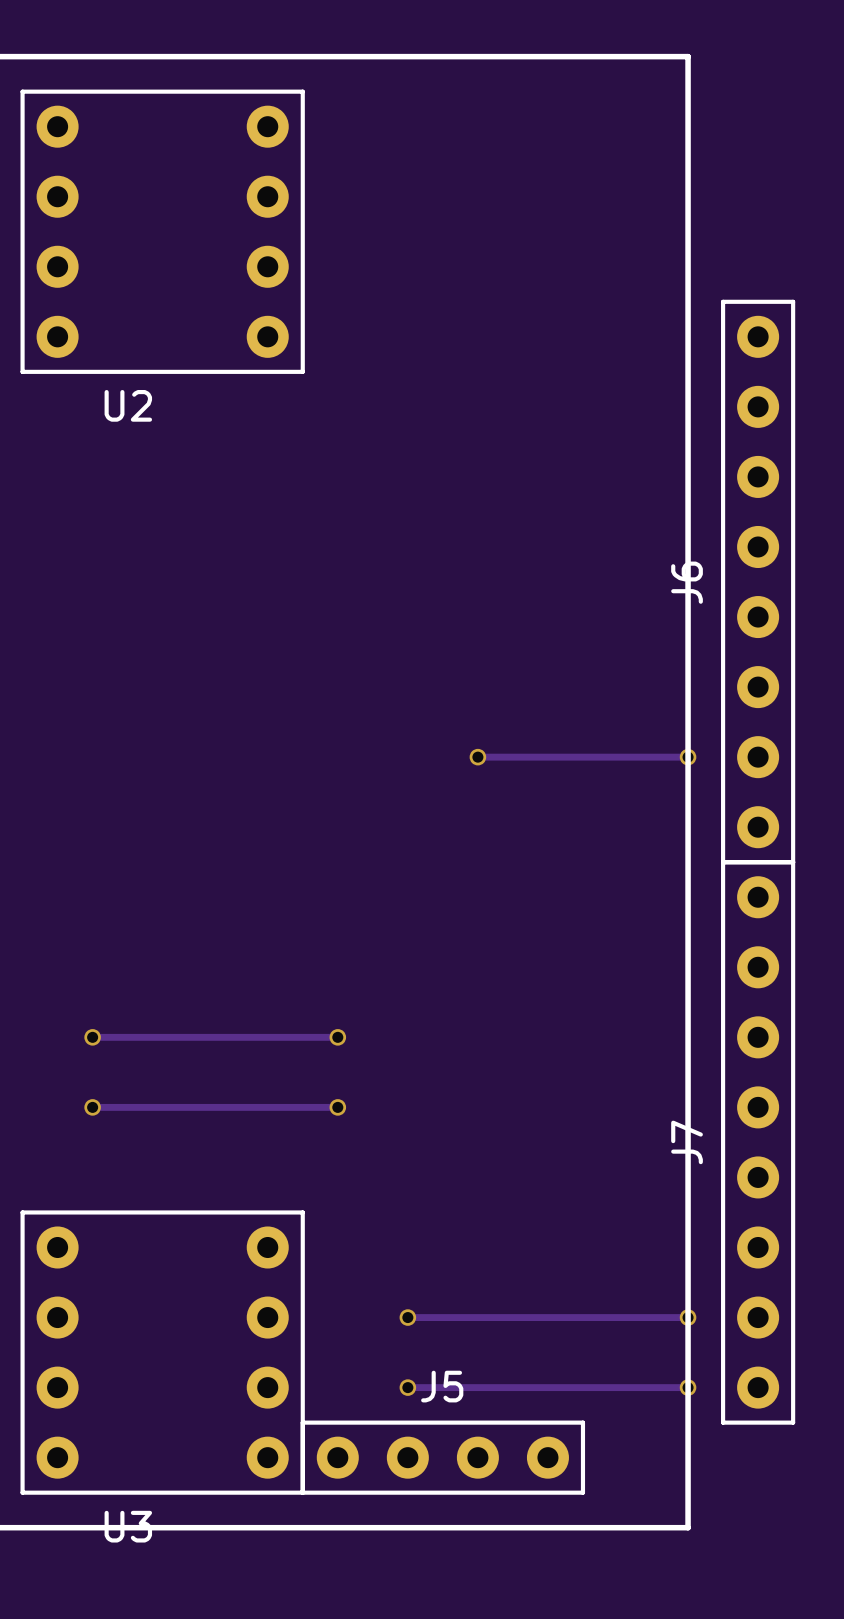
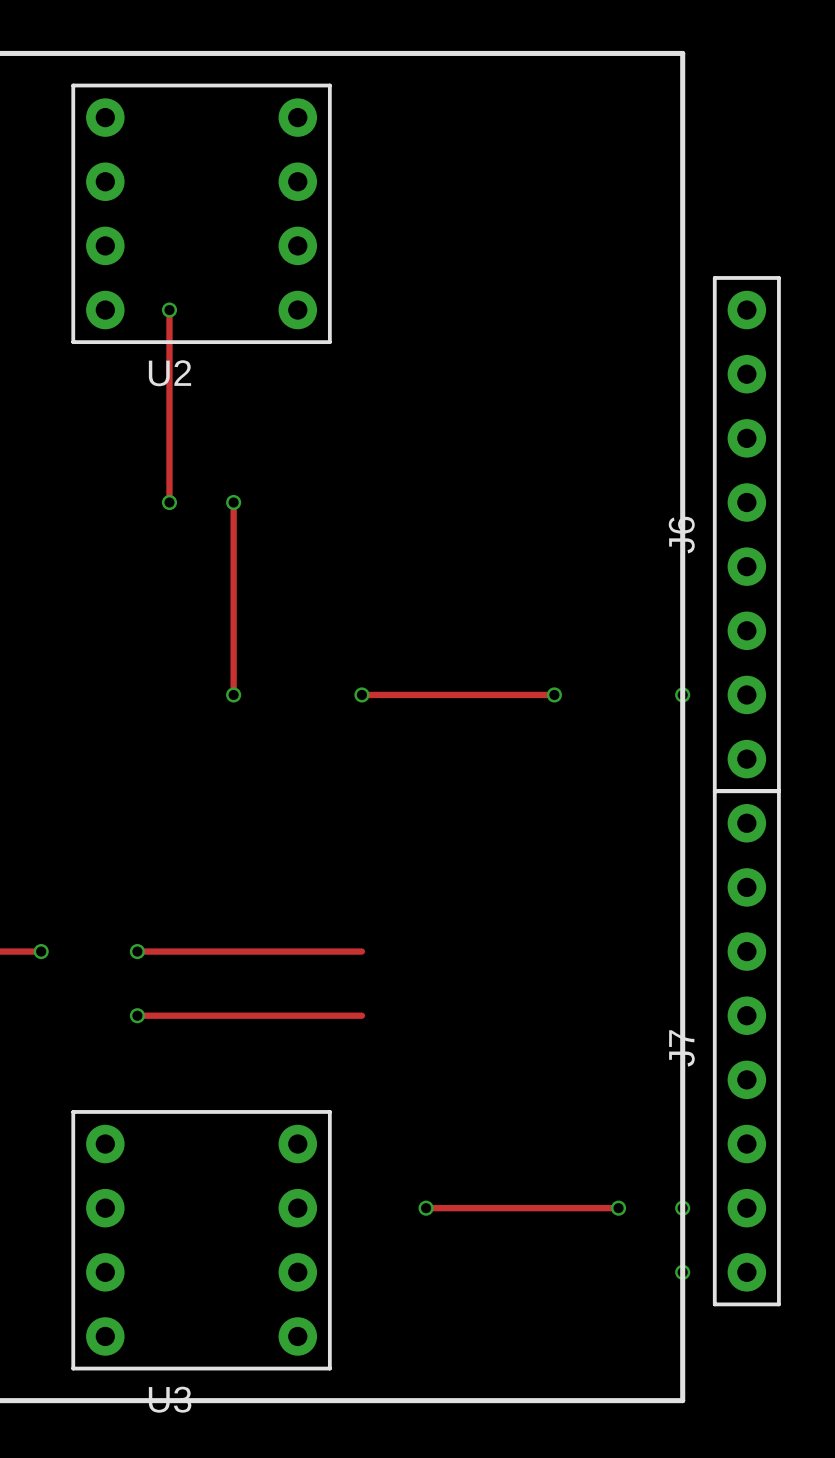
track: none -> (169, 310) (169, 502)
via: none -> (169, 310)
via: none -> (169, 502)
track: none -> (233, 502) (233, 694)
via: none -> (233, 502)
via: none -> (233, 694)
via: none -> (361, 694)
via: (477, 757) -> none
track: (547, 757) (688, 757) -> (361, 694) (490, 694)
via: none -> (554, 694)
via: (337, 1037) -> none
via: (337, 1107) -> none
track: (618, 1317) (688, 1317) -> none
via: none -> (618, 1208)
track: (407, 1387) (688, 1387) -> none
via: (407, 1387) -> none
J5: (442, 1457) -> none

